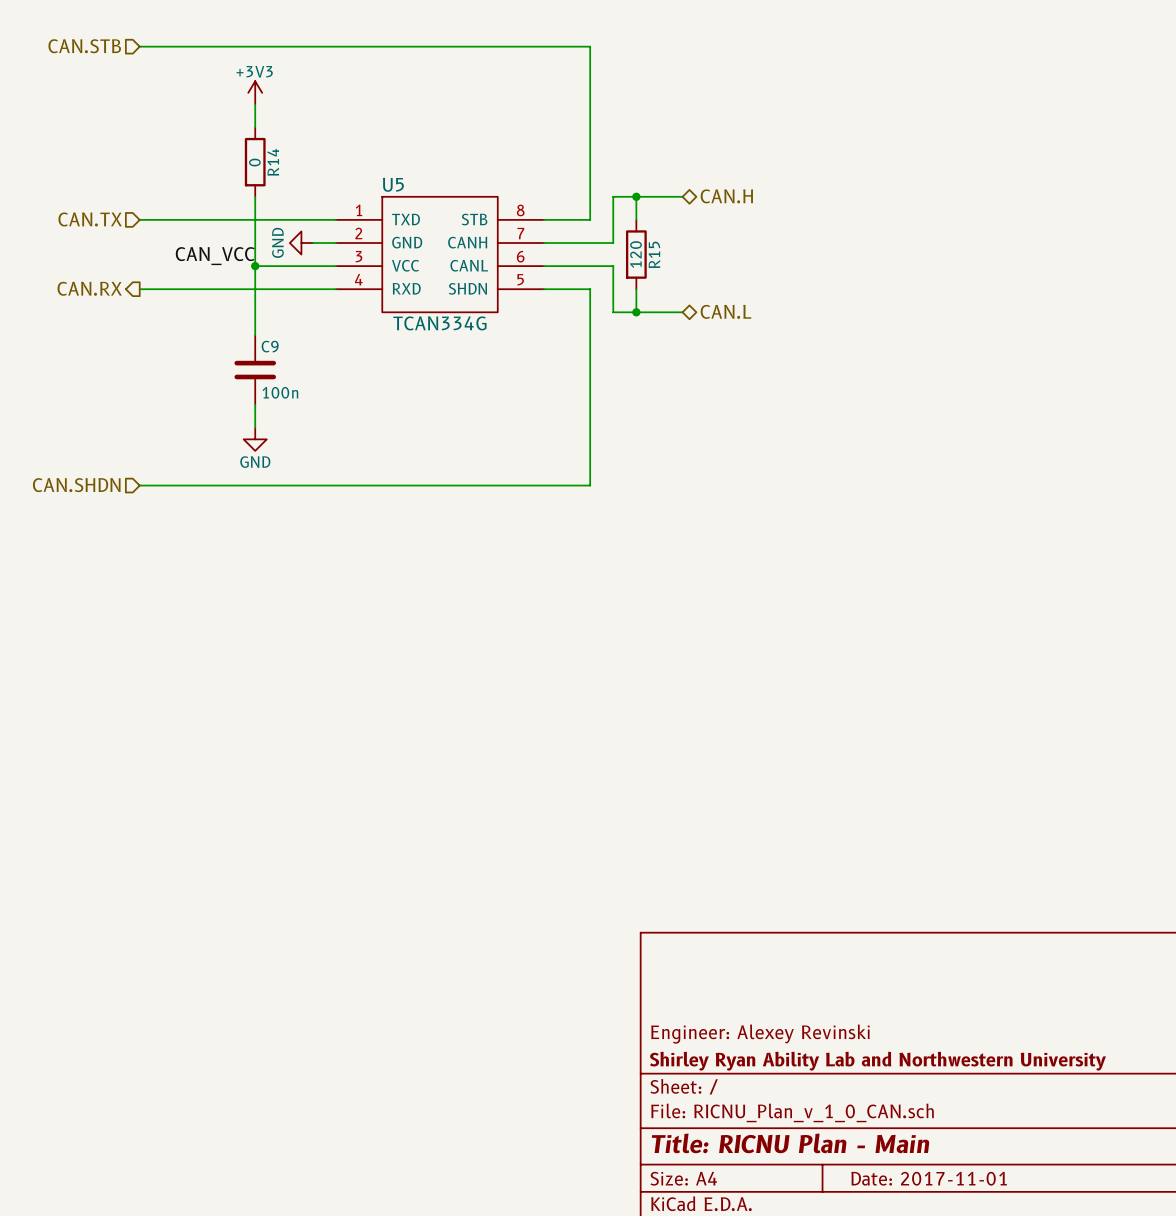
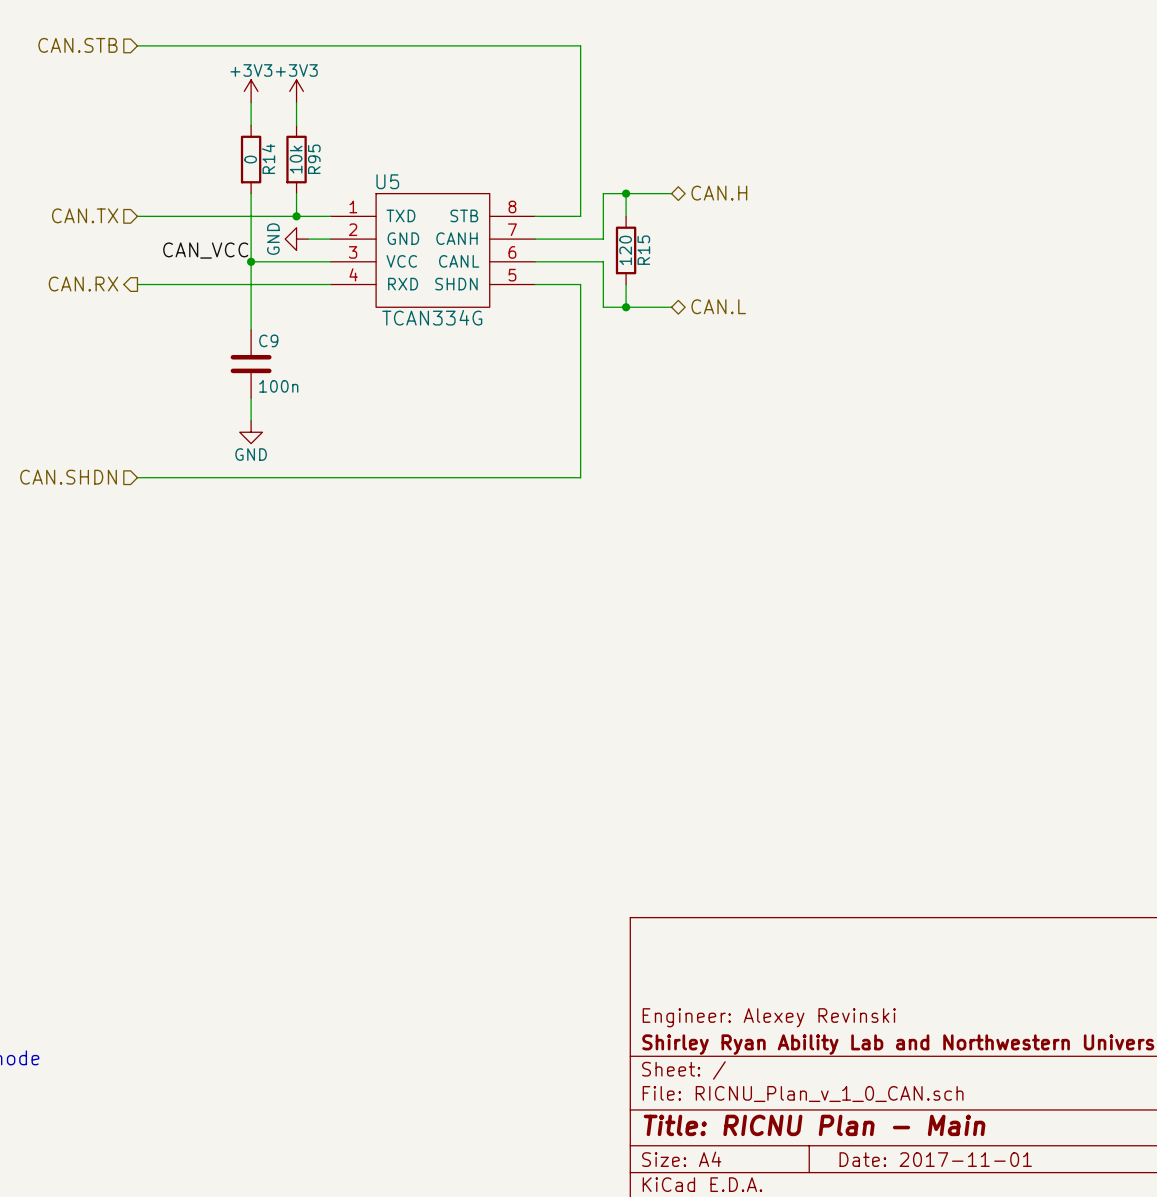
power symbol: none -> +3V3 (296, 91)
wire: none -> (296, 102) (296, 125)
R95: none -> 10k (296, 159)
wire: none -> (296, 193) (296, 216)
junction: none -> (296, 216)

